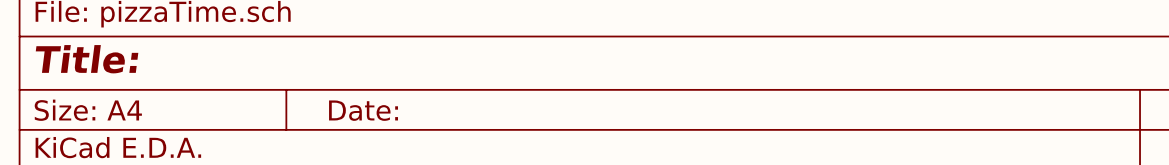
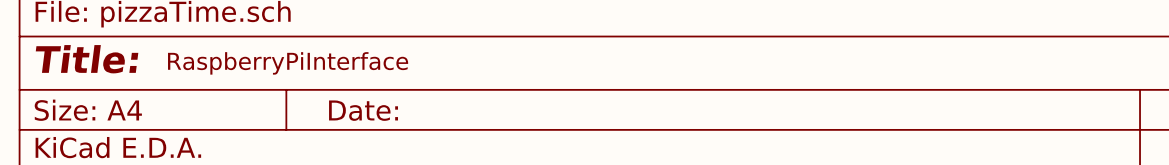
label: none -> RaspberryPiInterface (288, 63)

